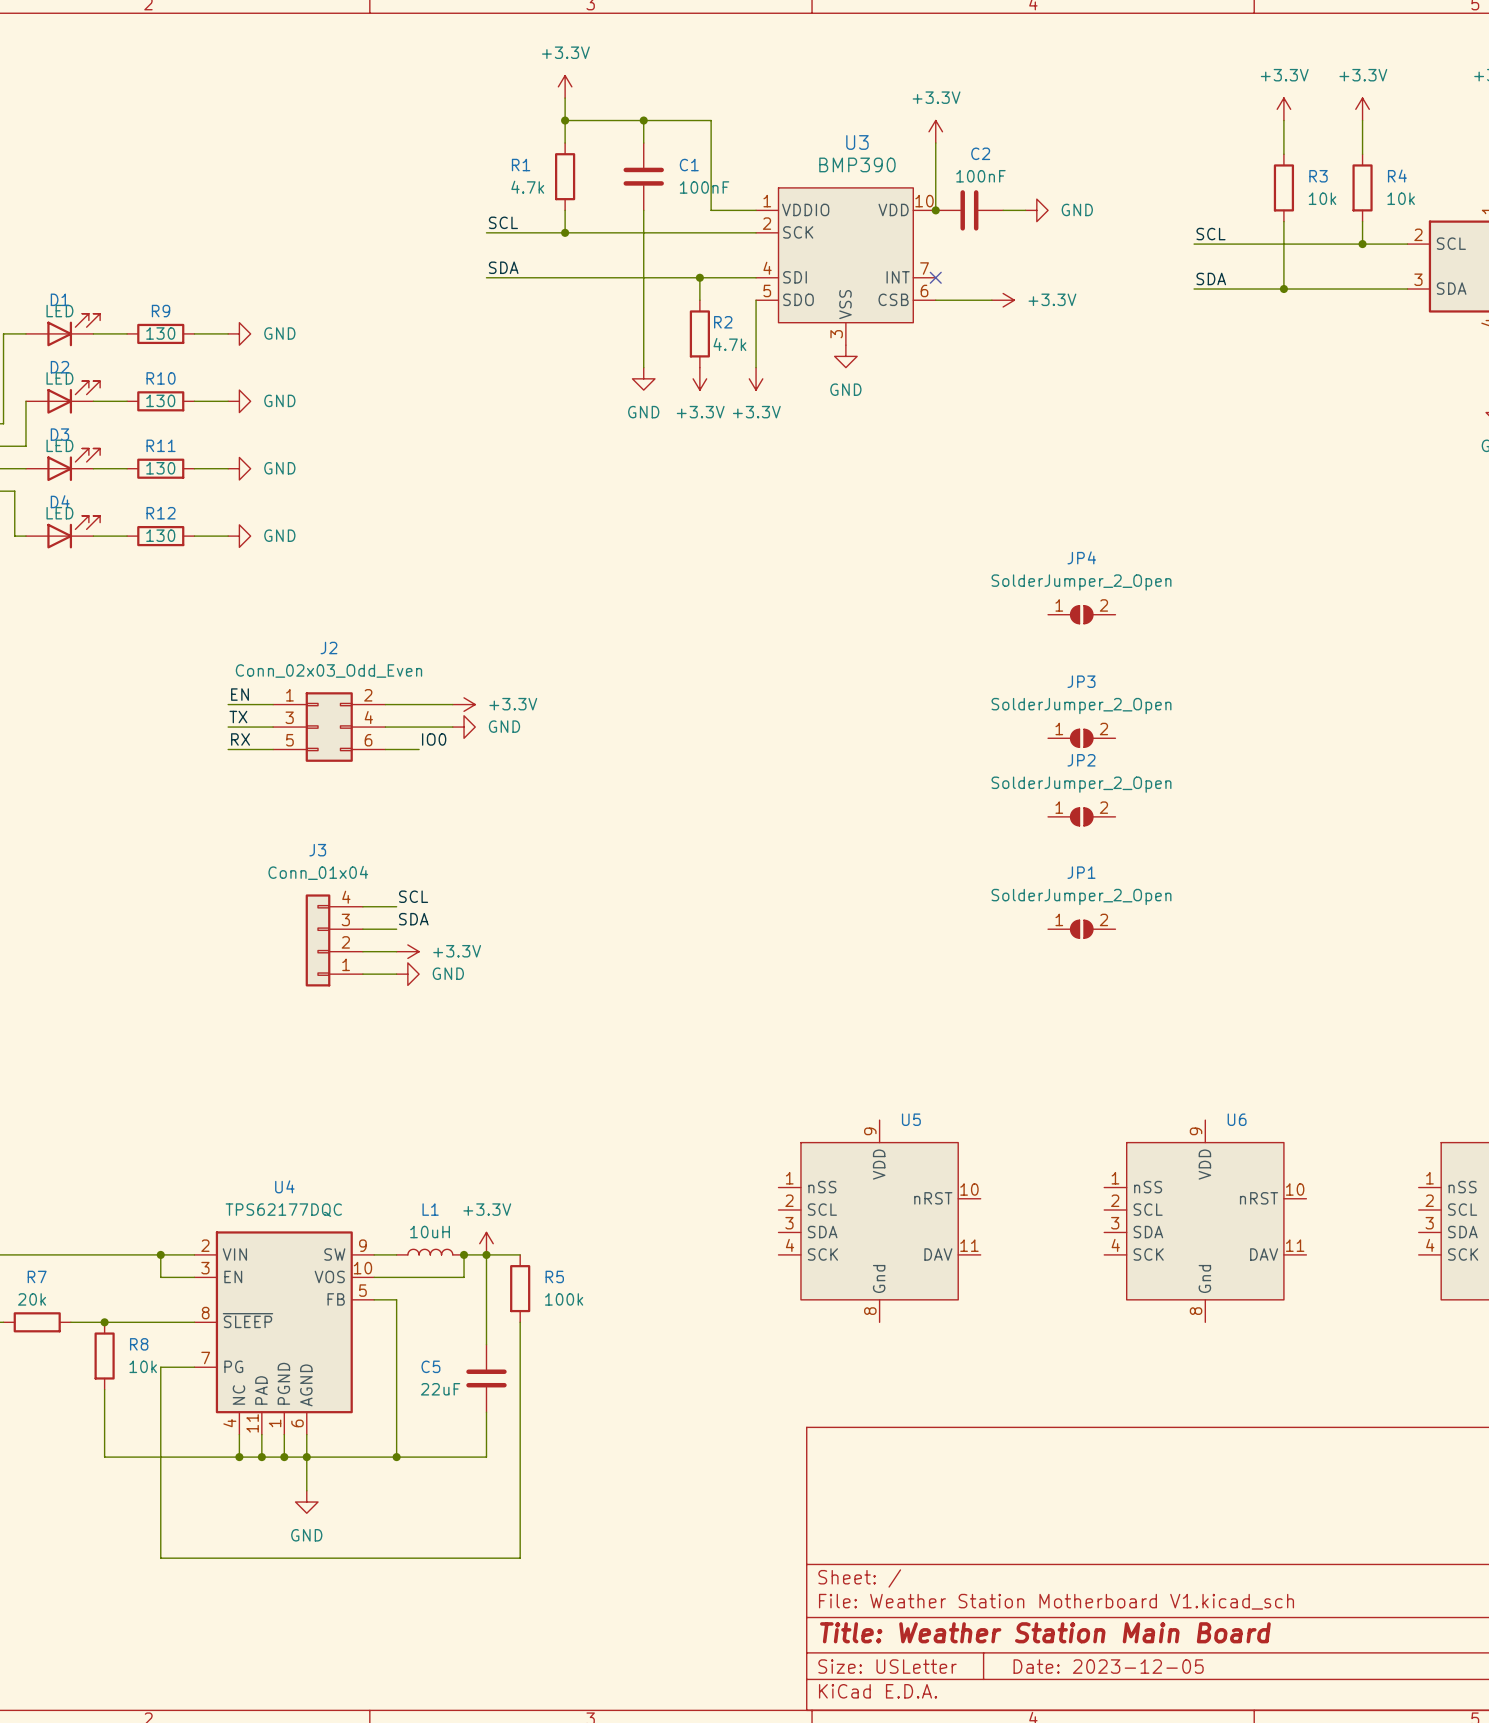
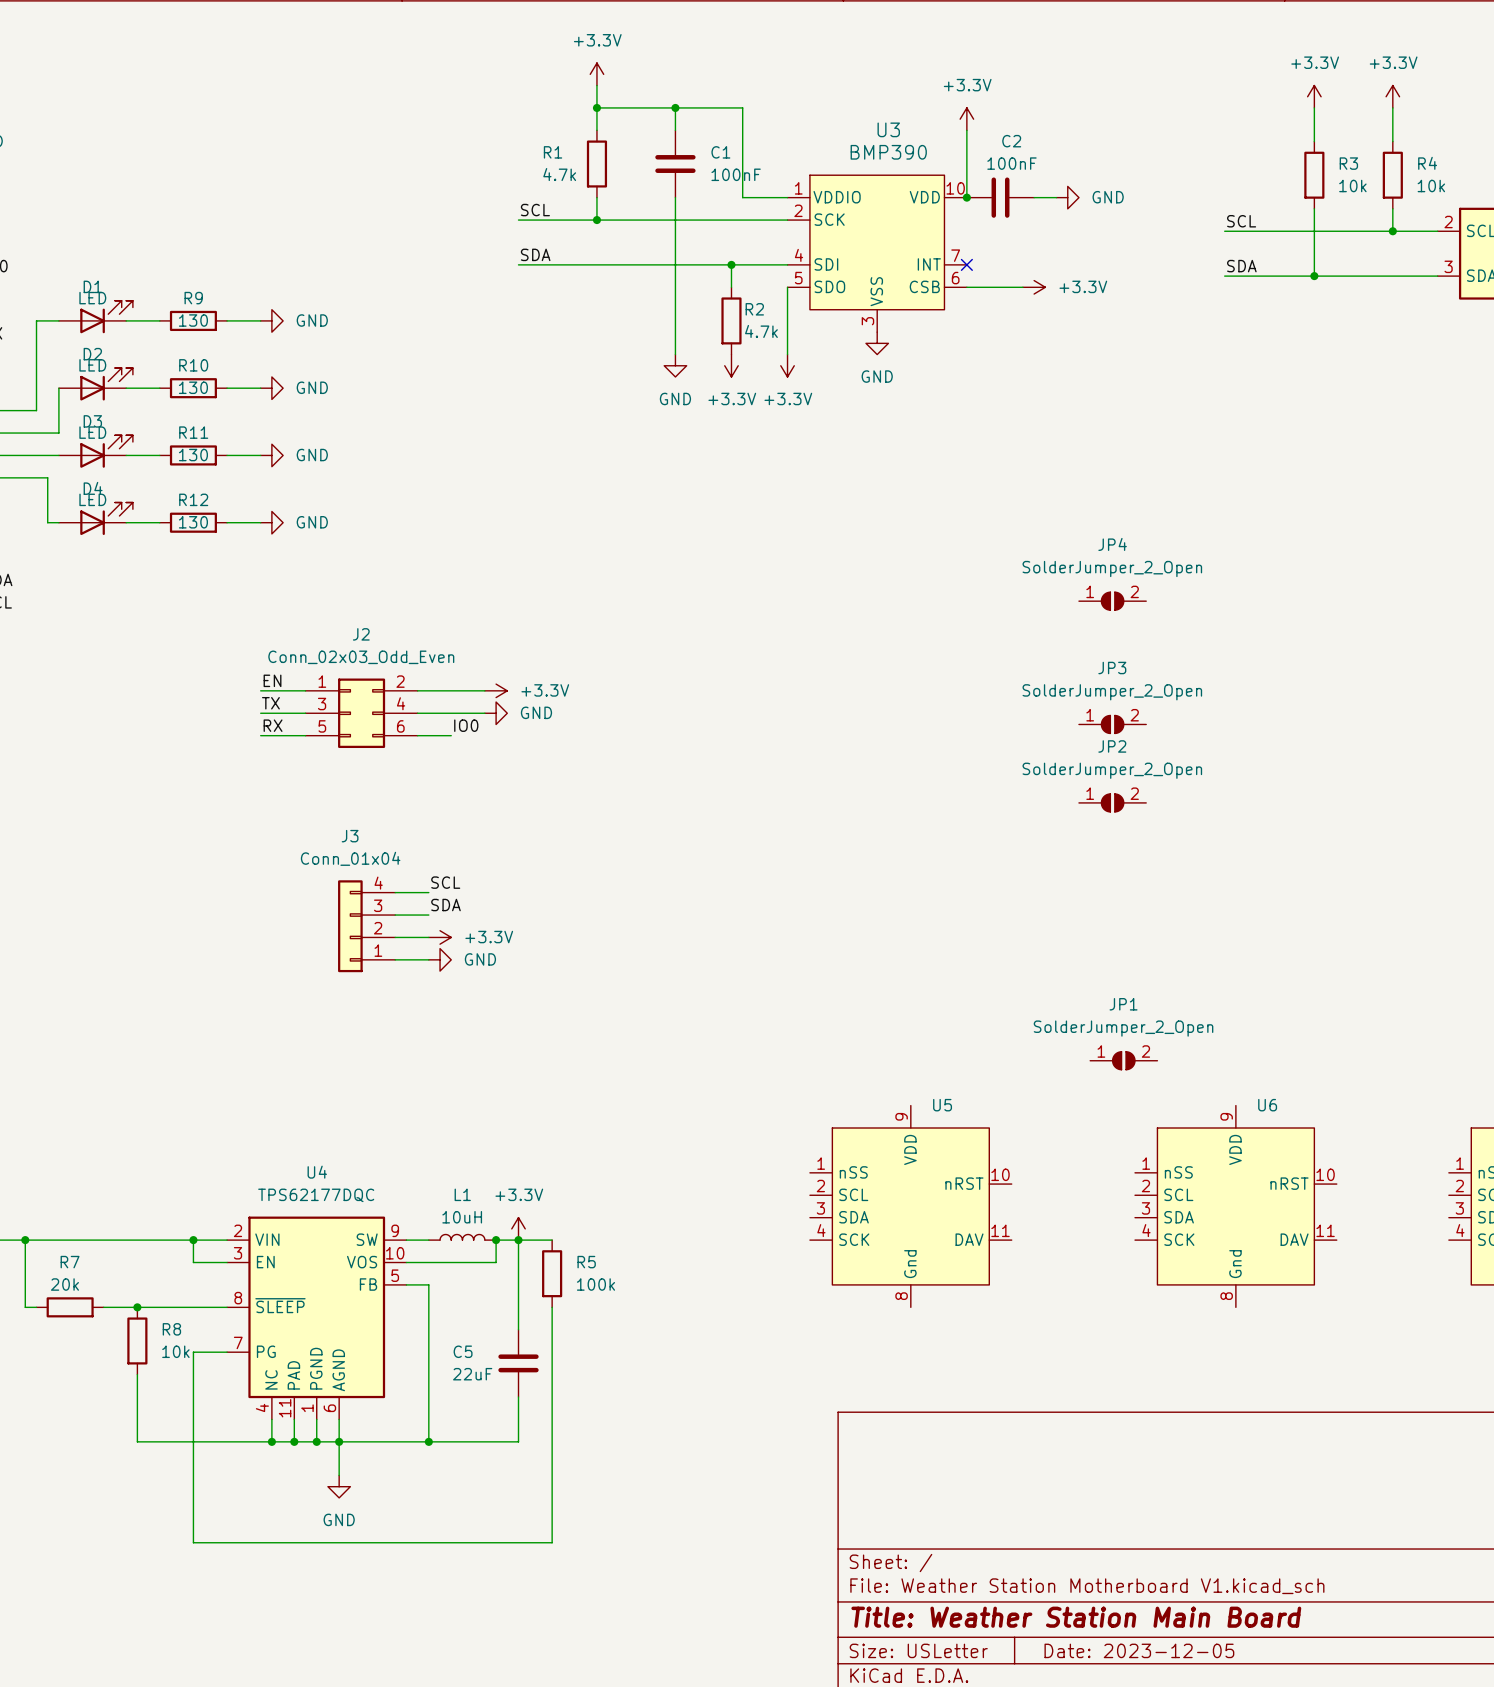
JP1 position: (1081, 929) -> (1123, 1060)

